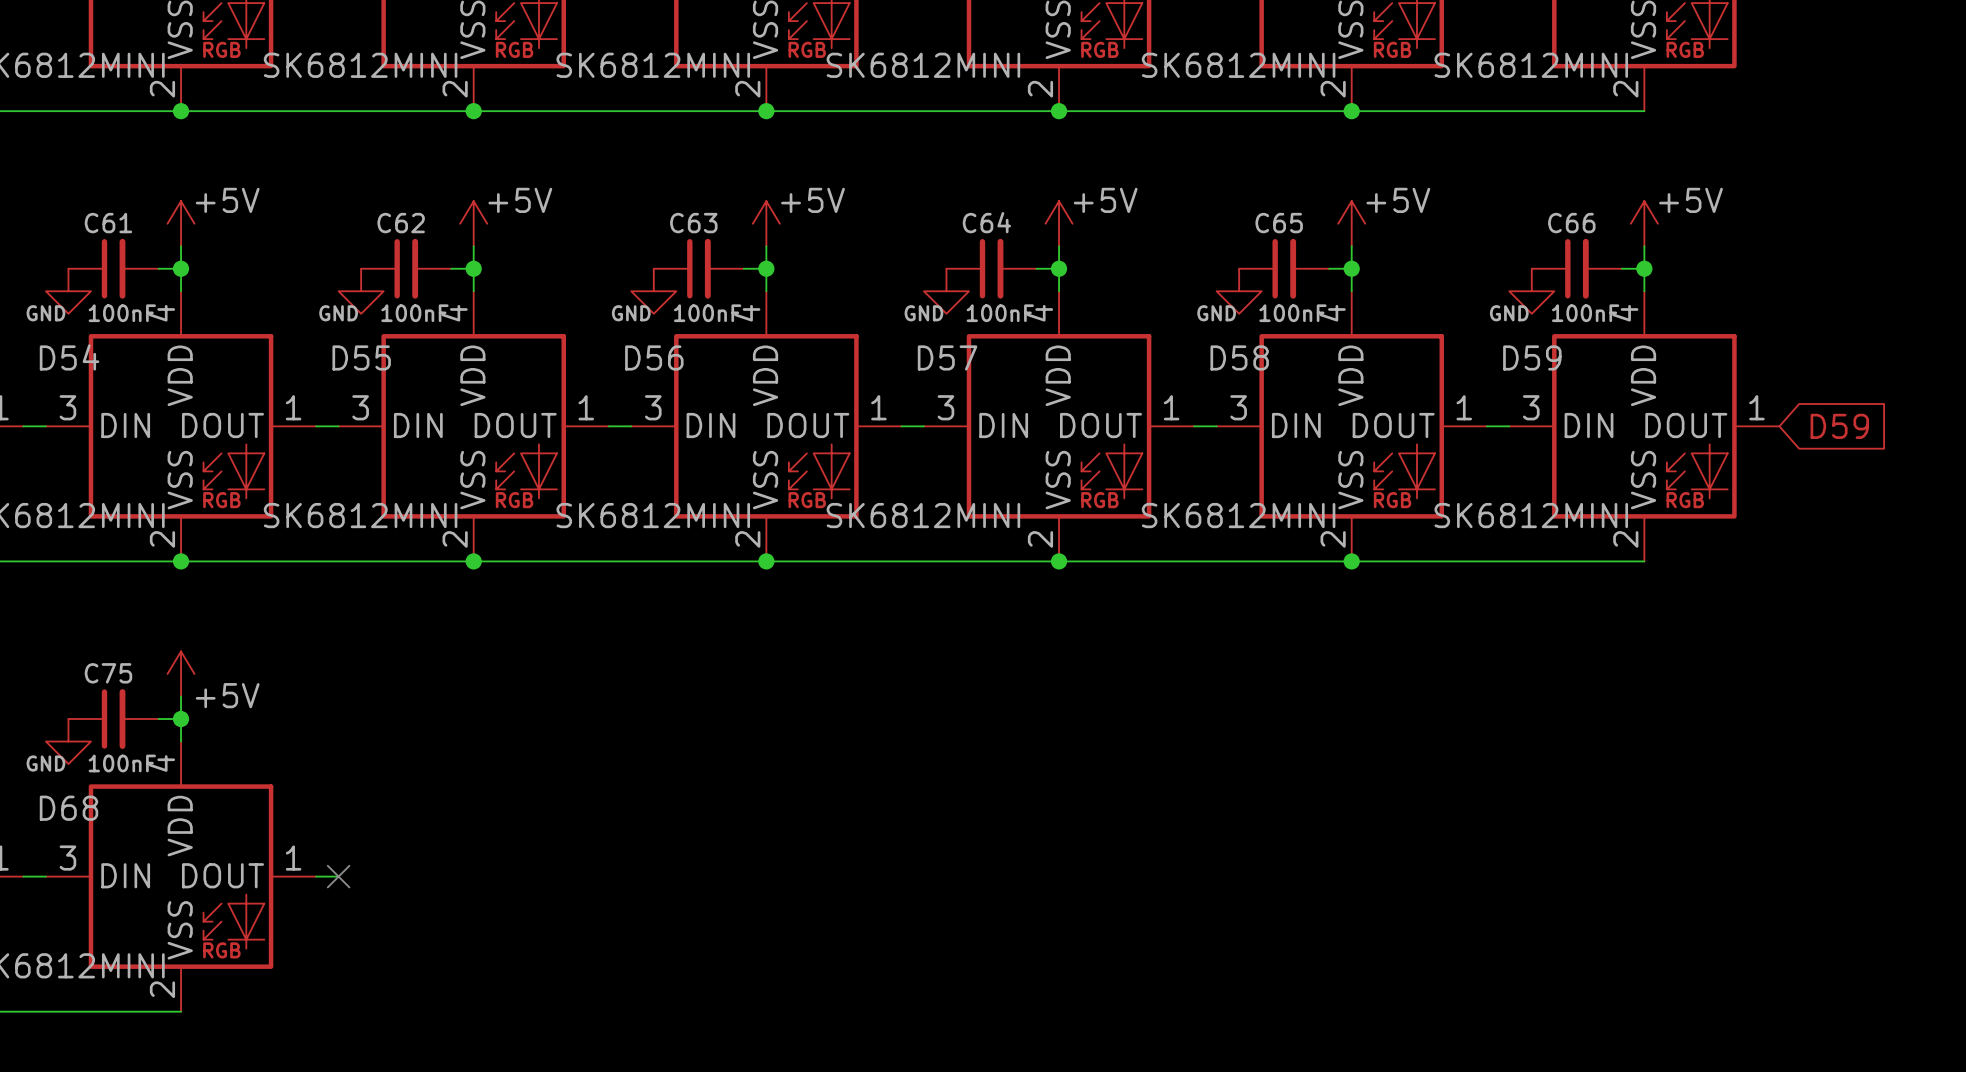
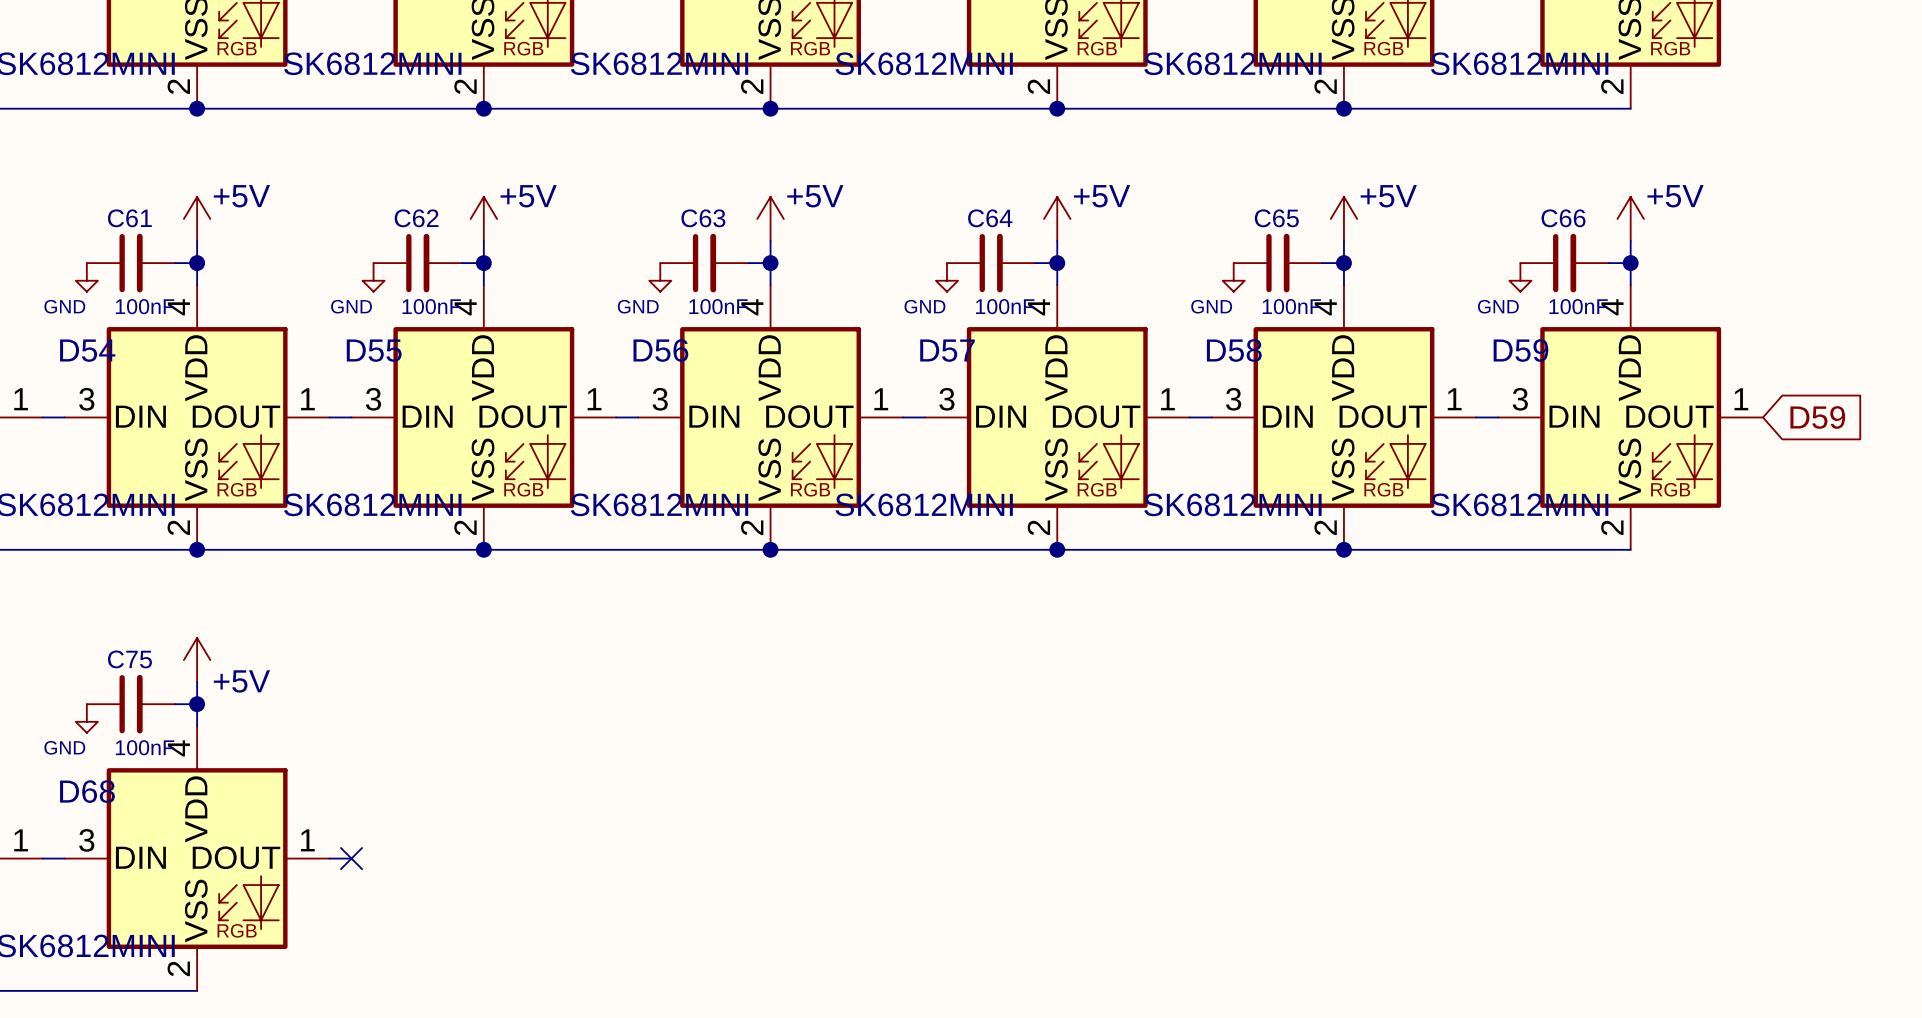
power symbol shape: [45, 268, 91, 314] -> [75, 263, 98, 292]
power symbol shape: [338, 268, 384, 314] -> [362, 263, 385, 292]
power symbol shape: [631, 268, 677, 314] -> [649, 263, 672, 292]
power symbol shape: [923, 268, 969, 314] -> [935, 263, 959, 292]
power symbol shape: [1216, 268, 1262, 314] -> [1222, 263, 1245, 292]
power symbol shape: [1509, 268, 1555, 314] -> [1509, 263, 1532, 292]
power symbol shape: [45, 719, 91, 765] -> [75, 704, 98, 733]

